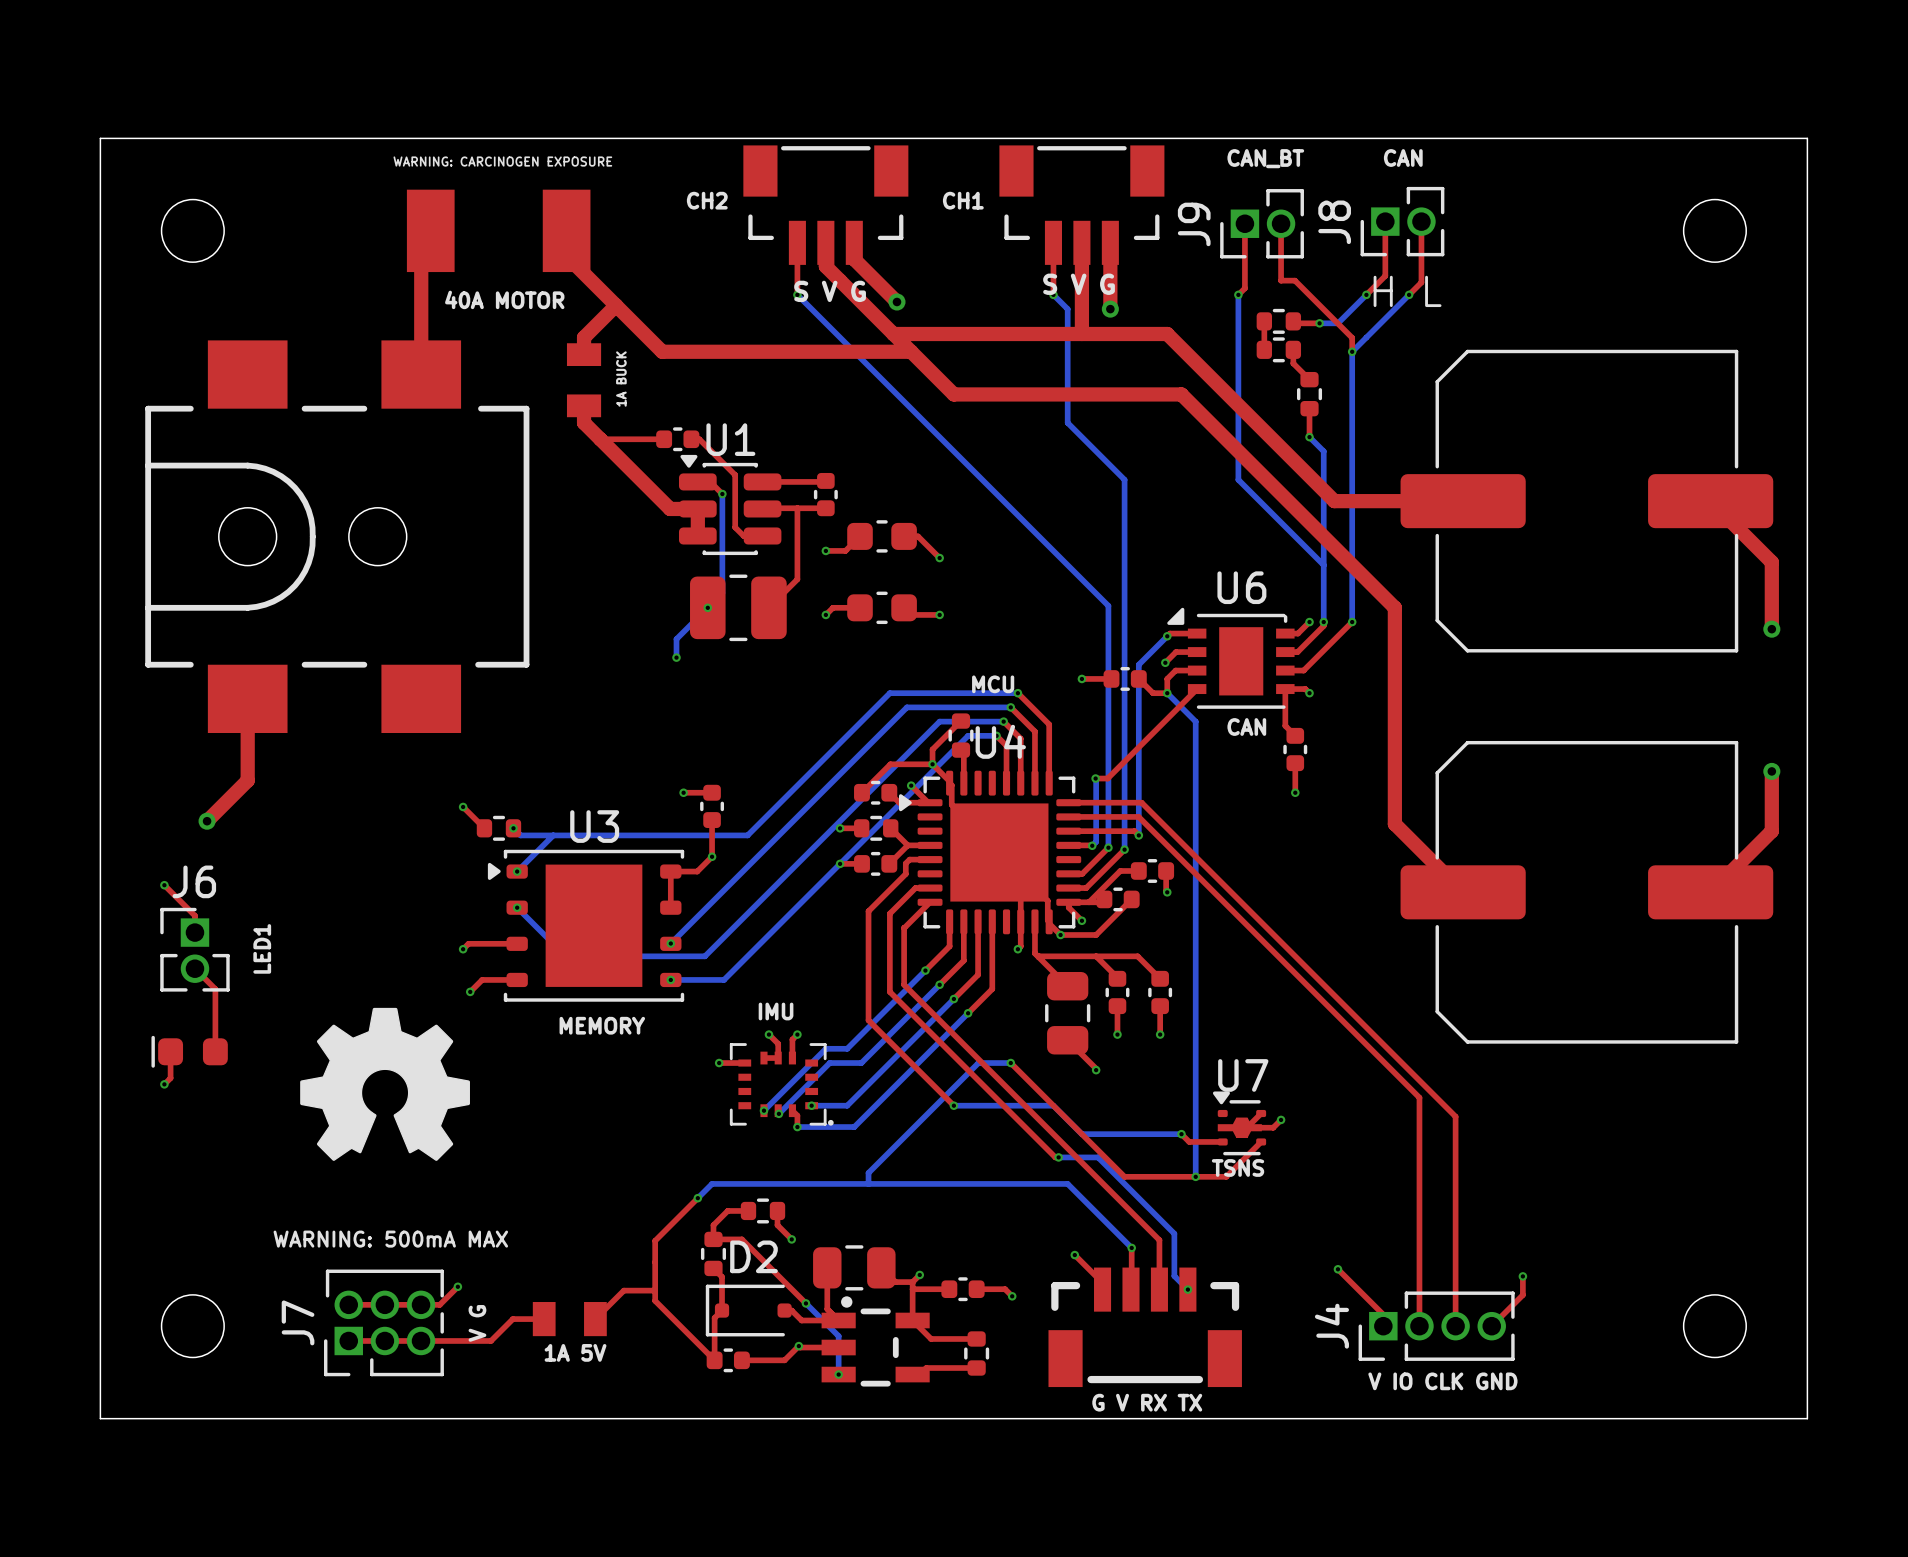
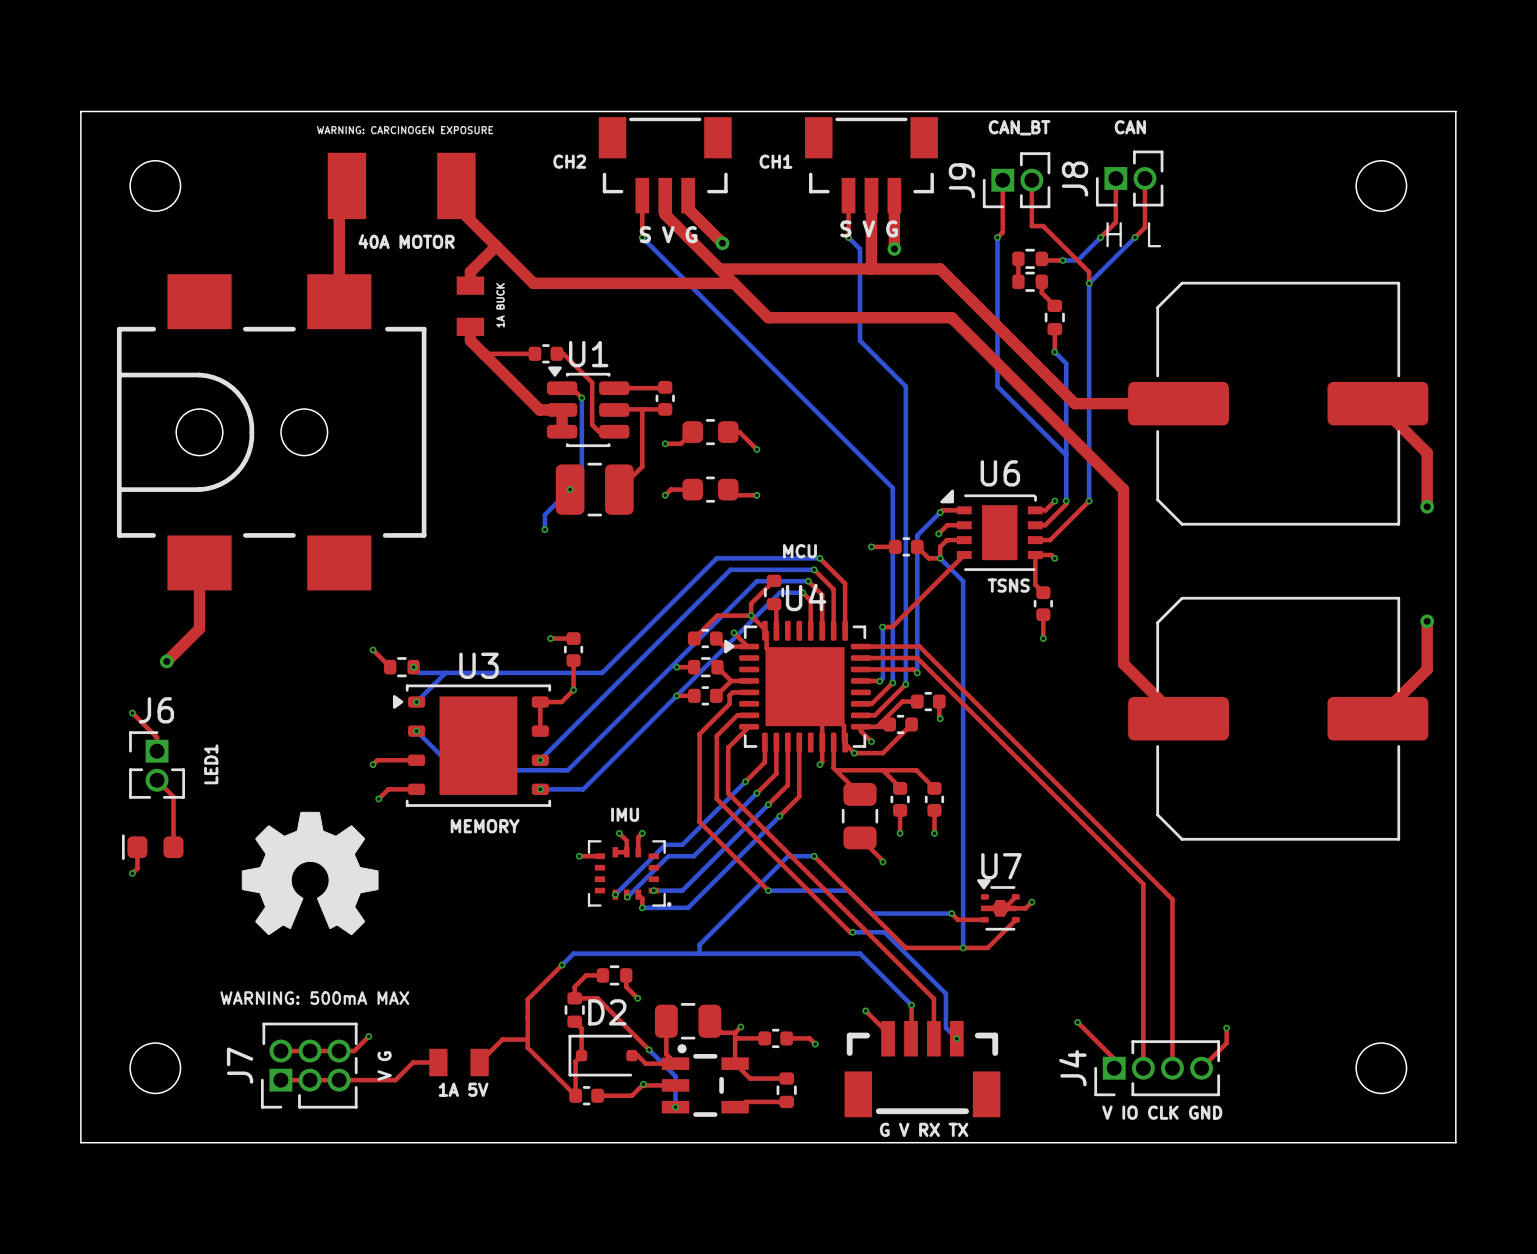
text: CAN (1246, 726) -> TSNS (1008, 585)
text: TSNS (1238, 1167) -> none

